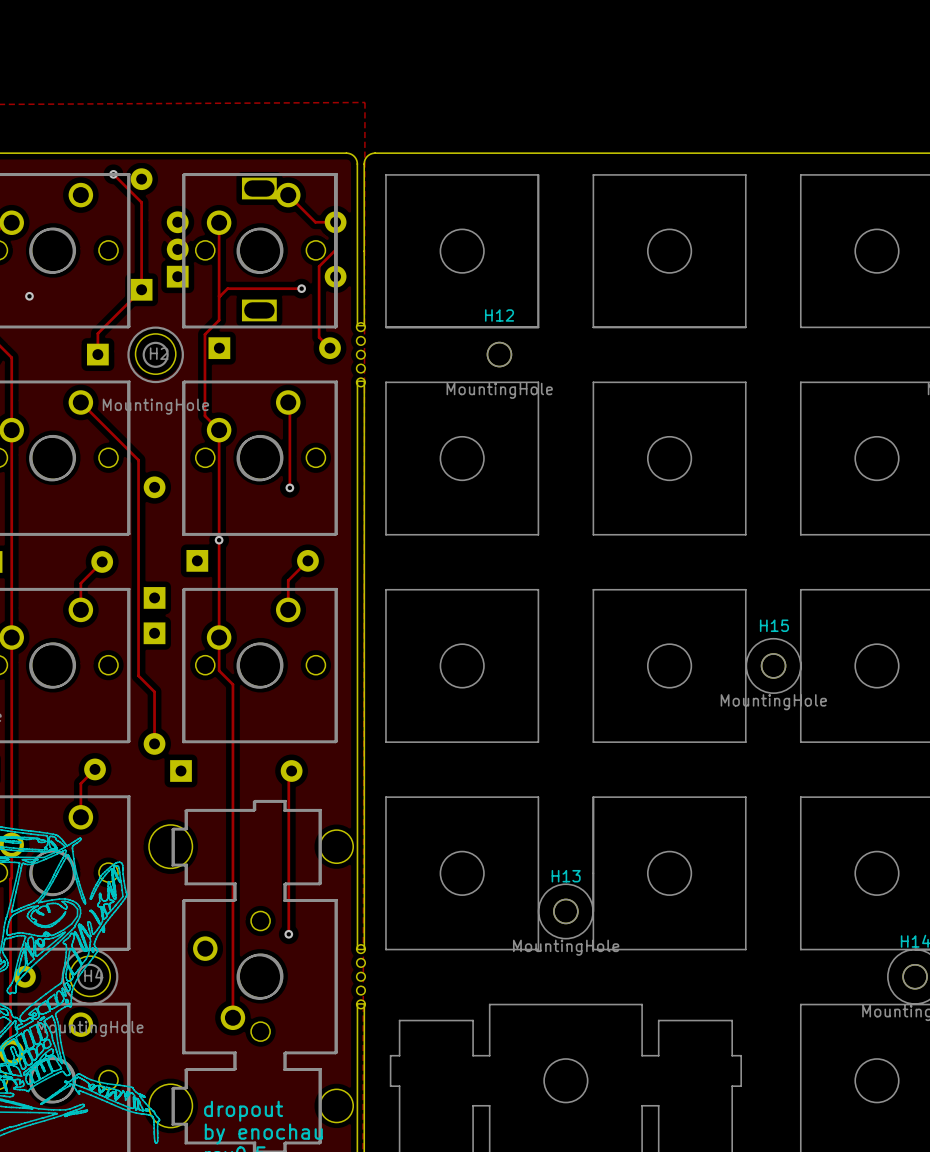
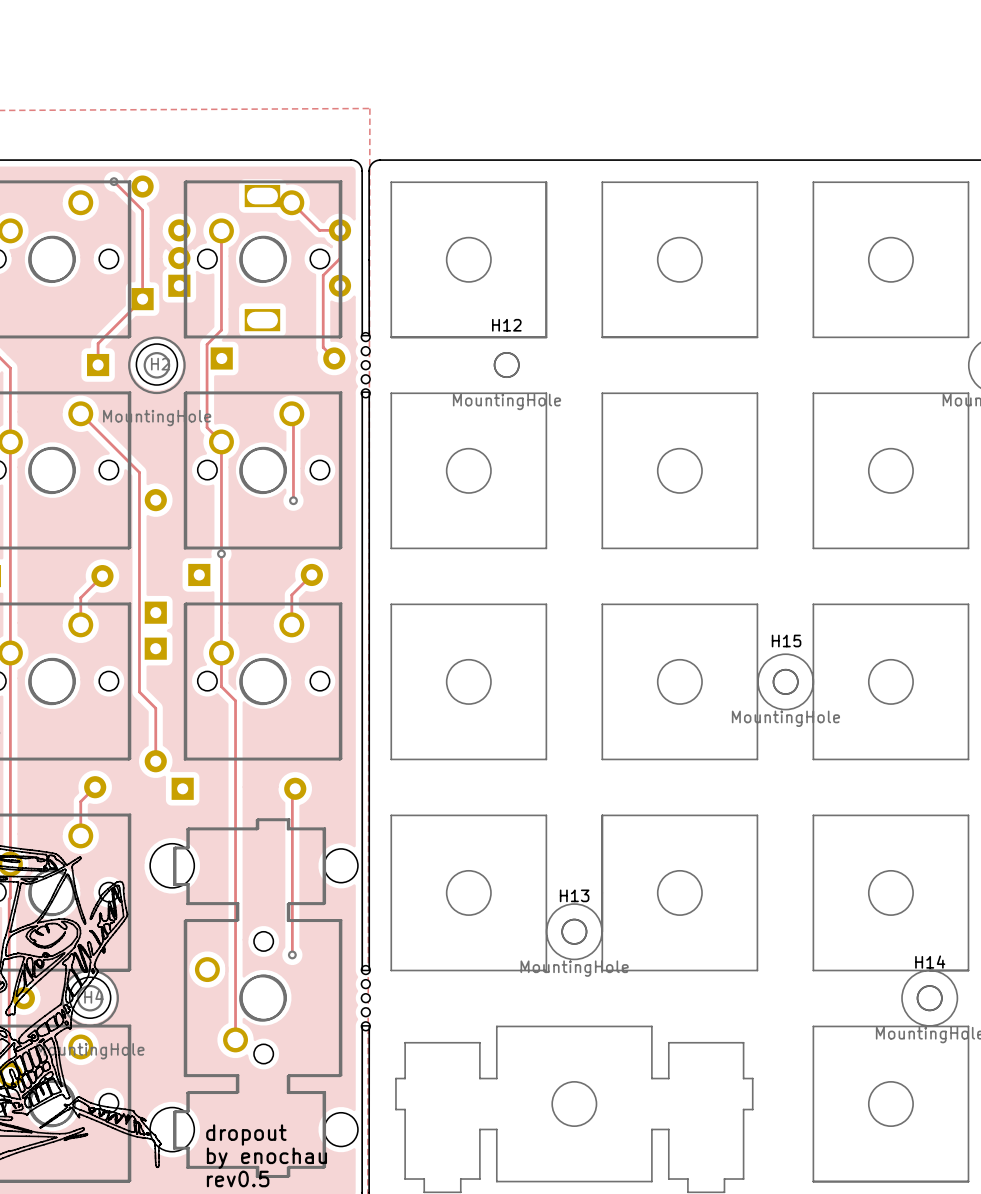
track: (301, 288) (227, 288) (219, 296) -> none
via: (301, 288) -> none
via: (29, 296) -> none

